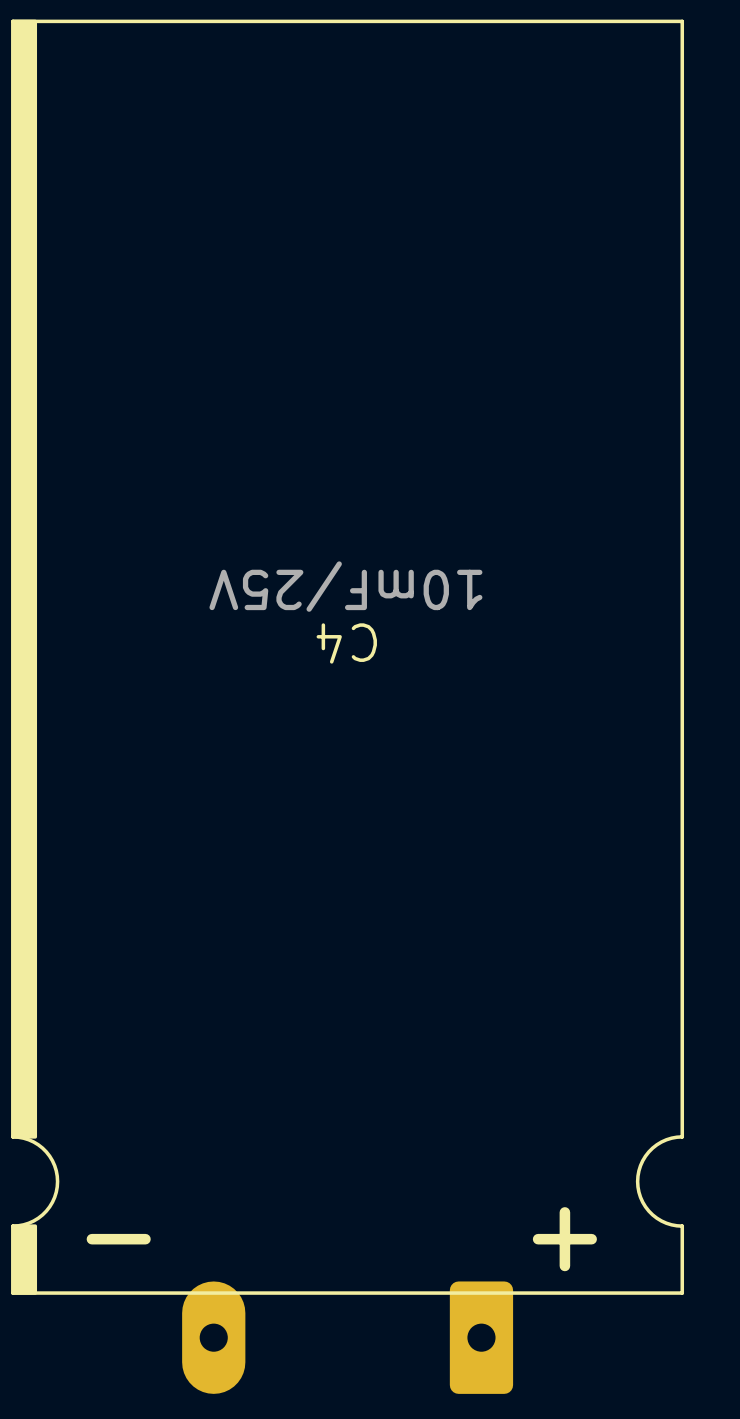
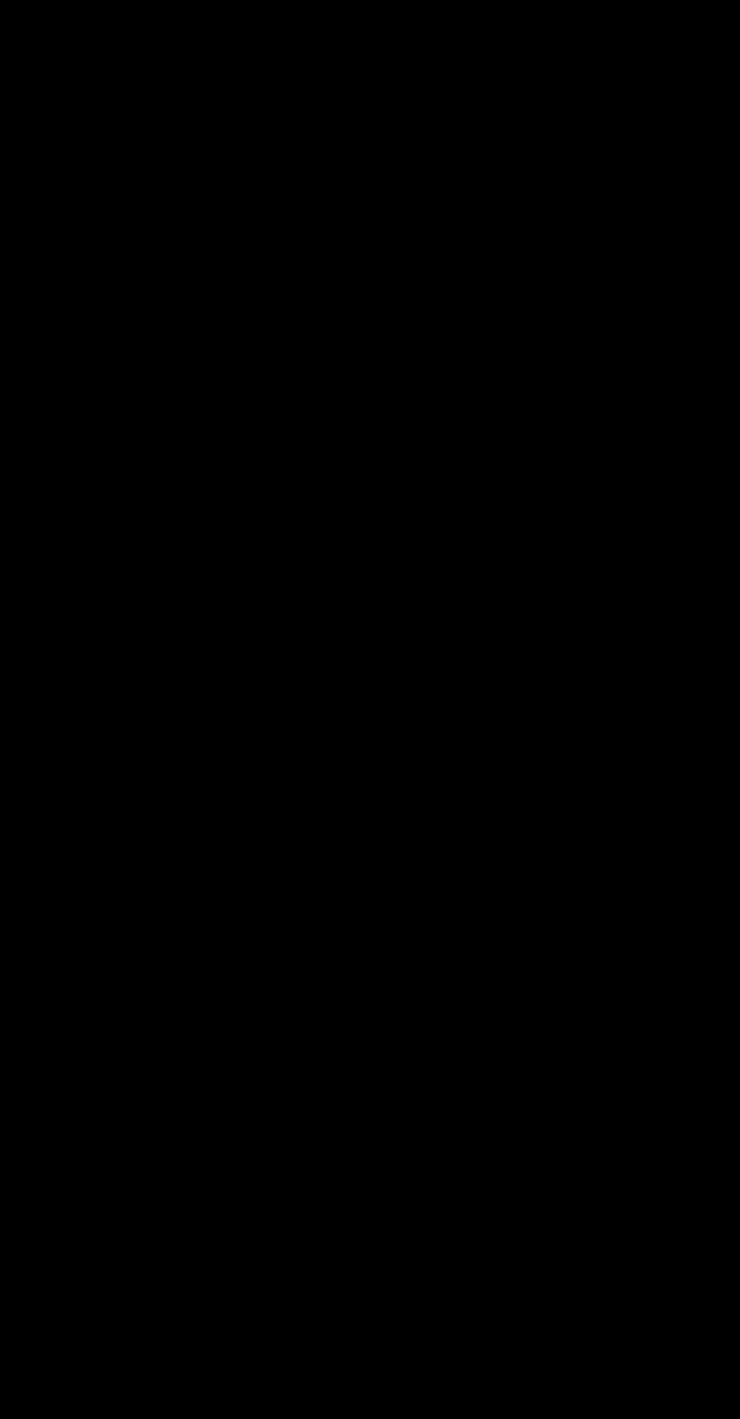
C4: 10mF/25V (347, 706) -> none

